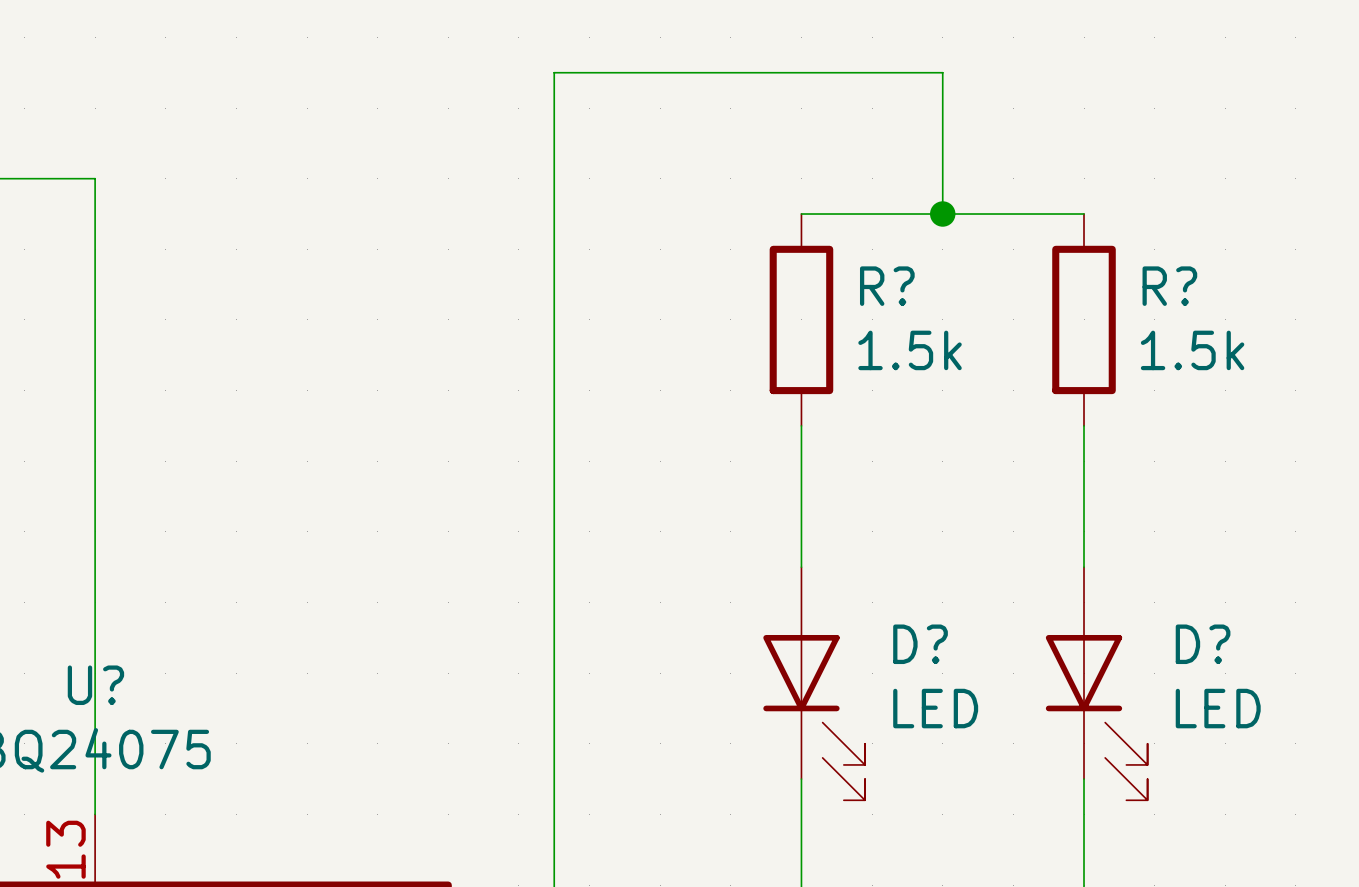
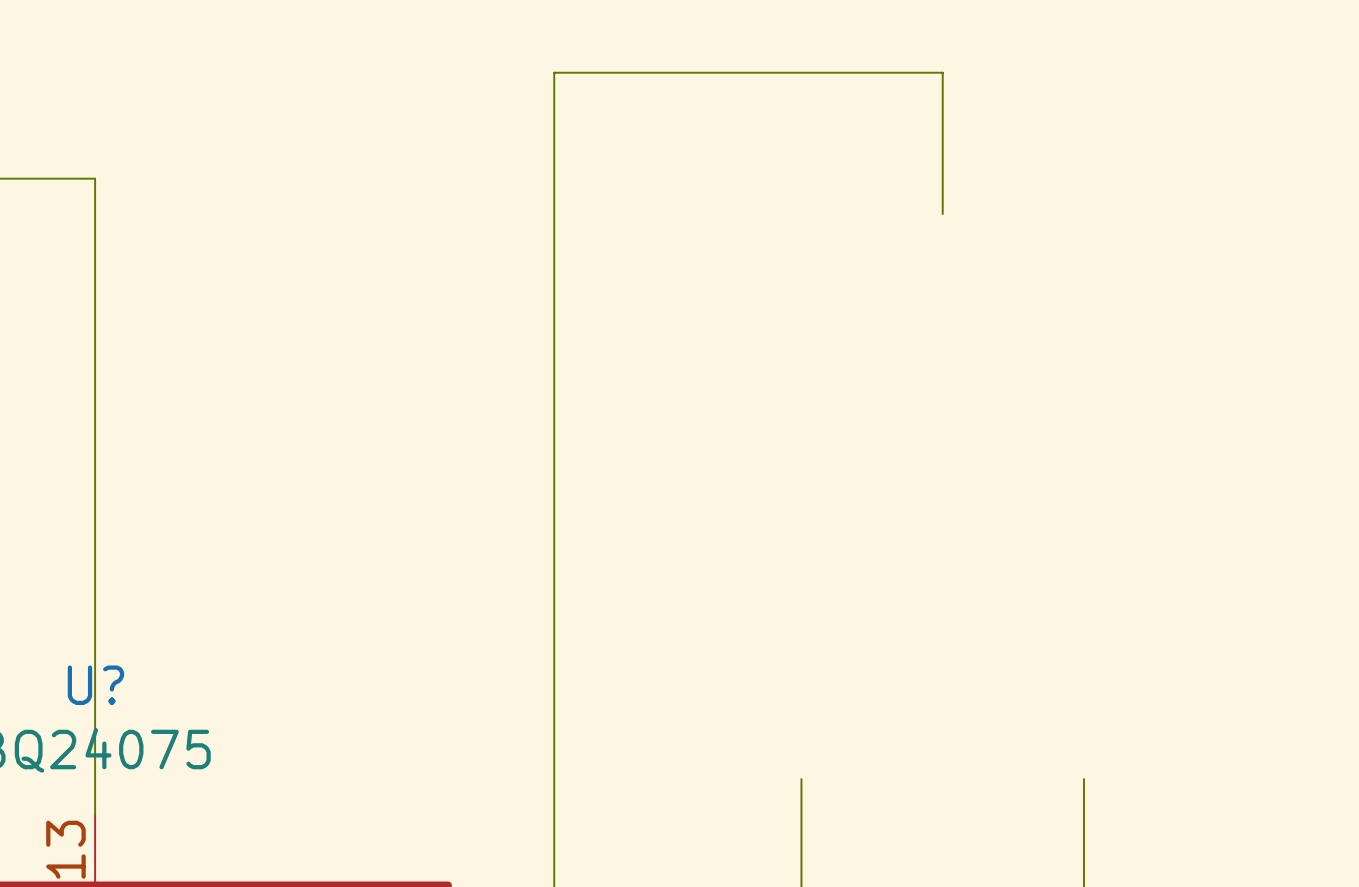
wire: (801, 214) (1084, 214) -> none
junction: (942, 214) -> none
R?: 1.5k (801, 319) -> none
R?: 1.5k (1084, 319) -> none
wire: (801, 425) (801, 567) -> none
wire: (1084, 425) (1084, 567) -> none
D?: LED (814, 683) -> none
D?: LED (1096, 683) -> none

